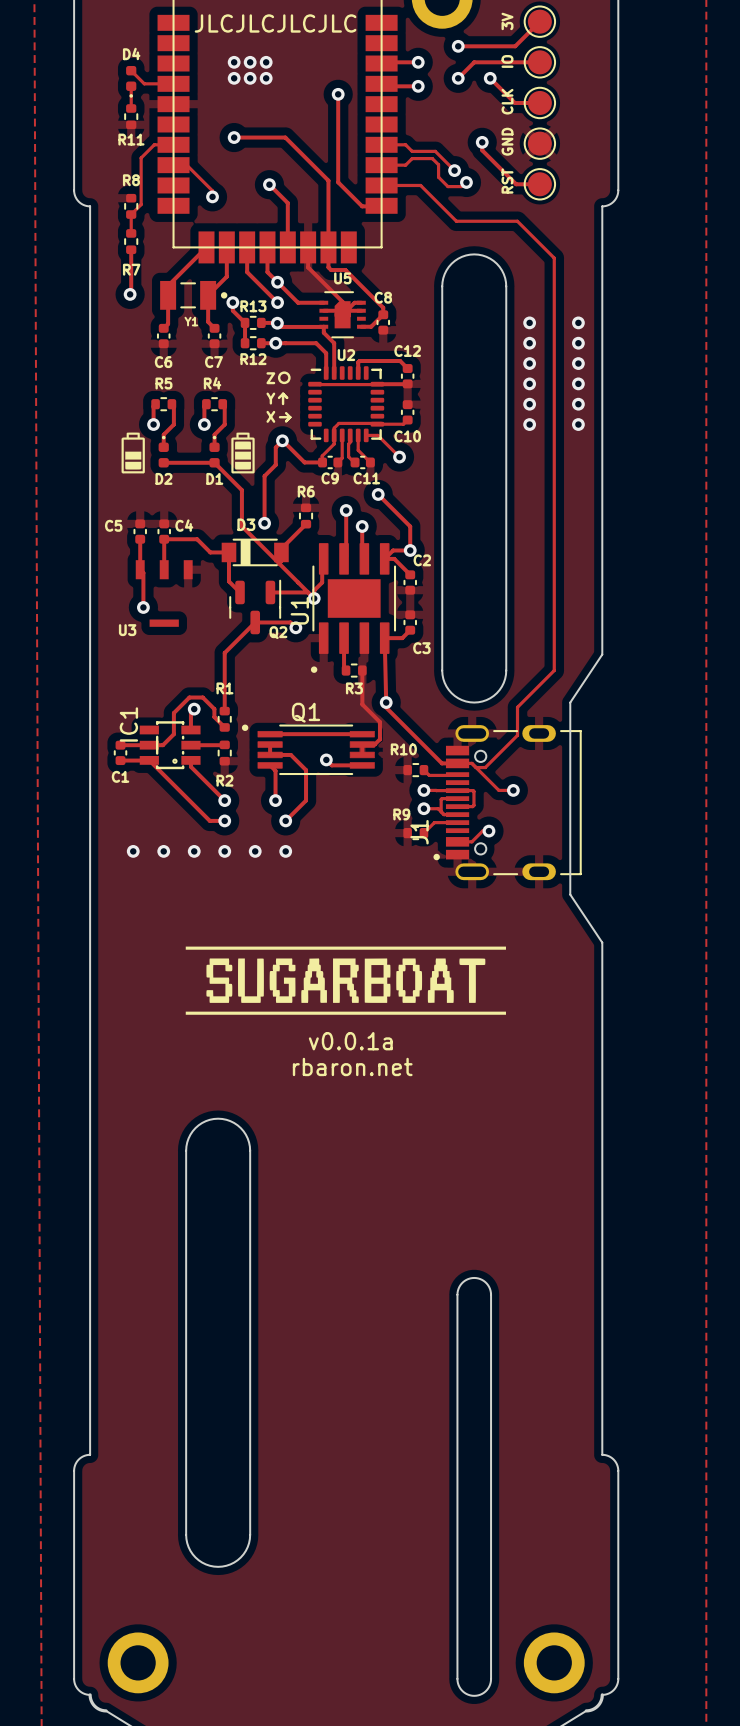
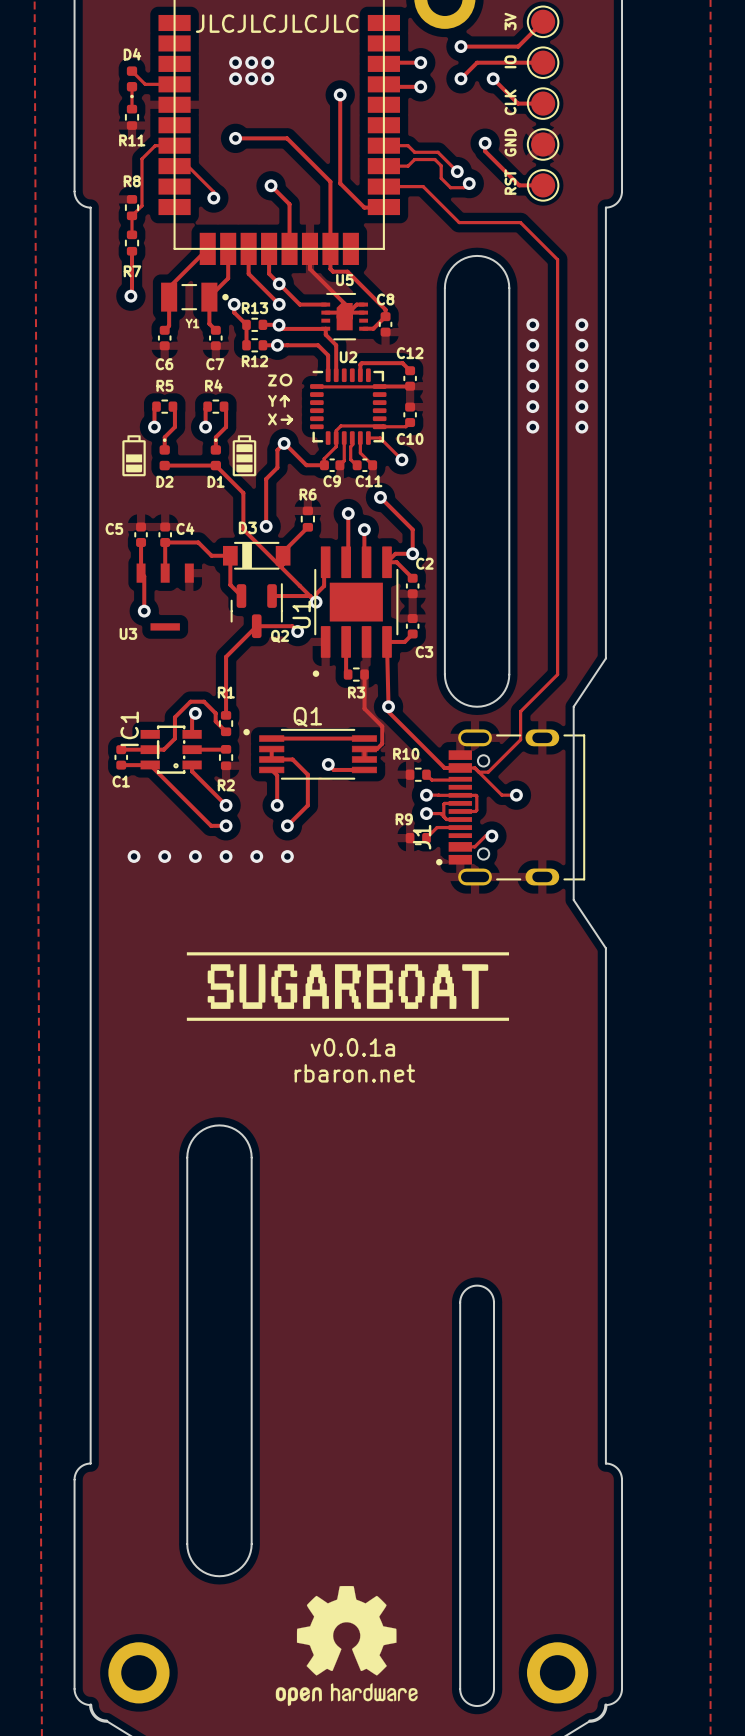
drawing: none -> [275, 1585, 418, 1706]

